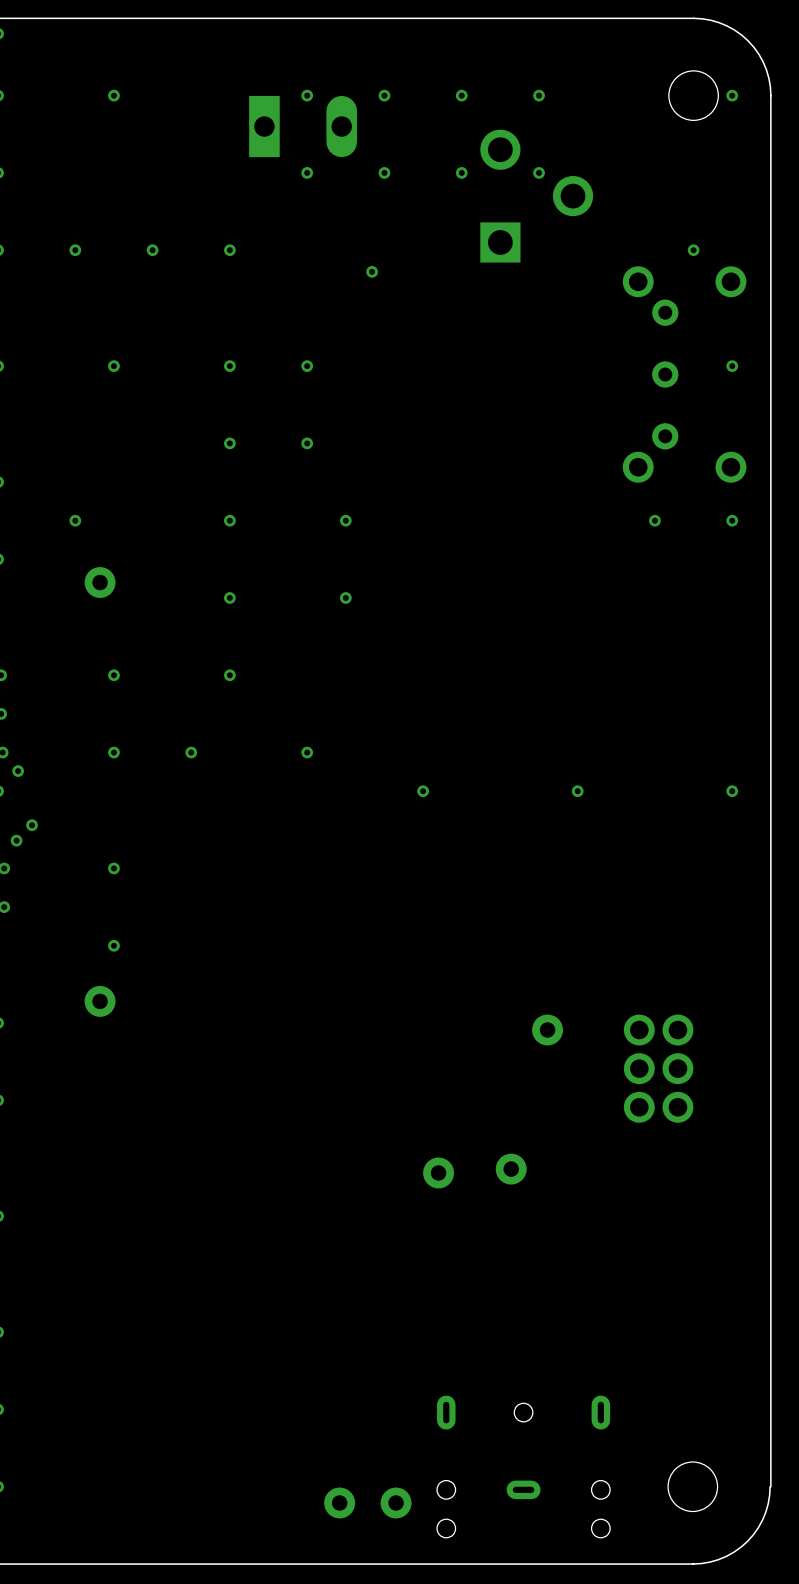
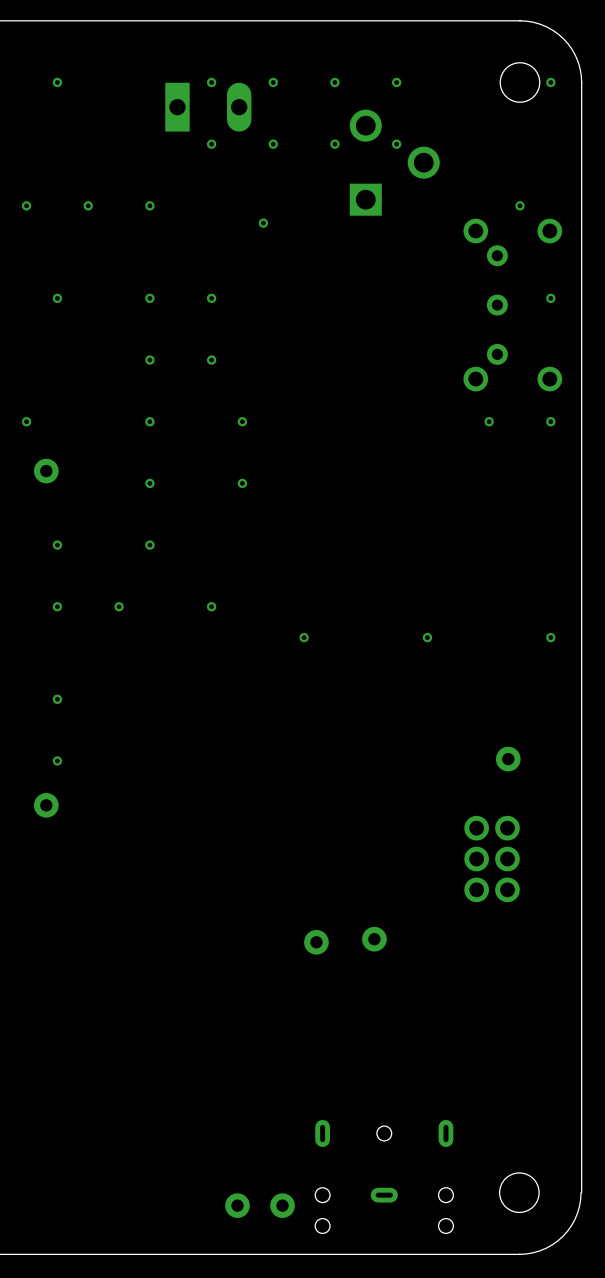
part position: (547, 1030) -> (508, 759)

